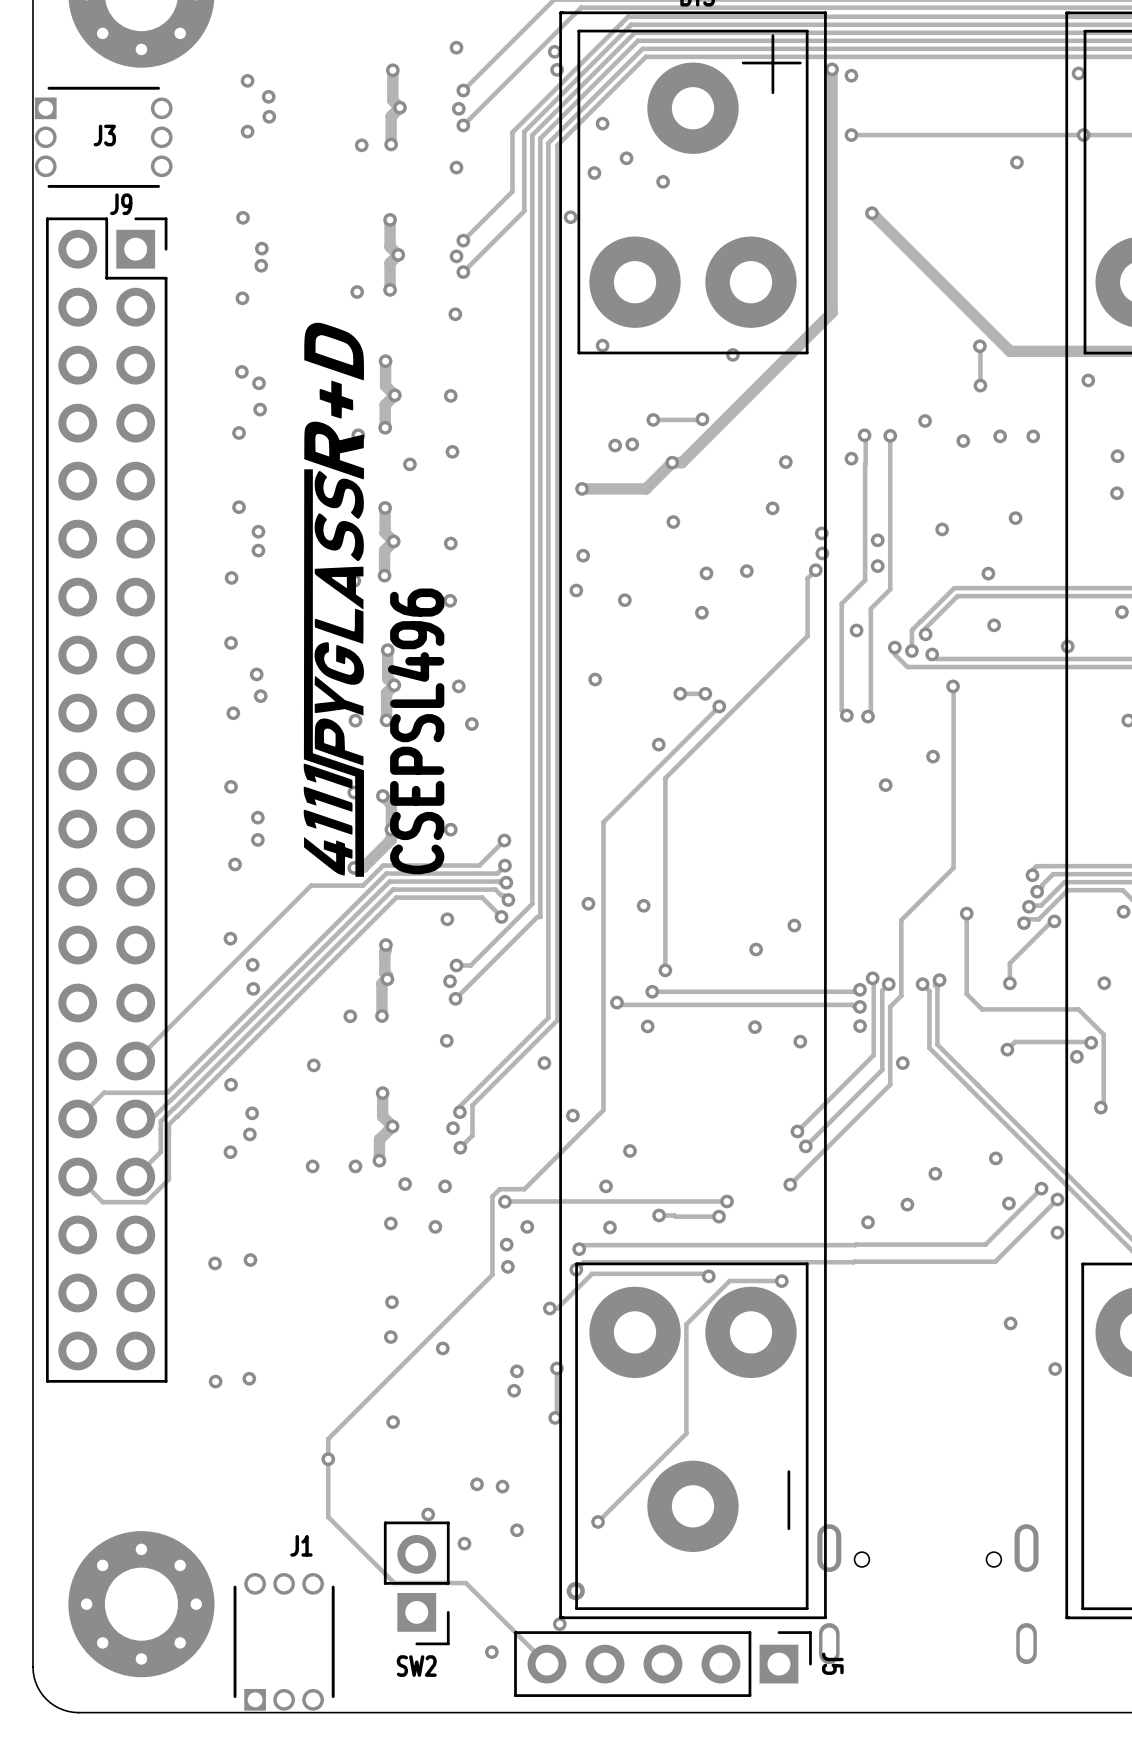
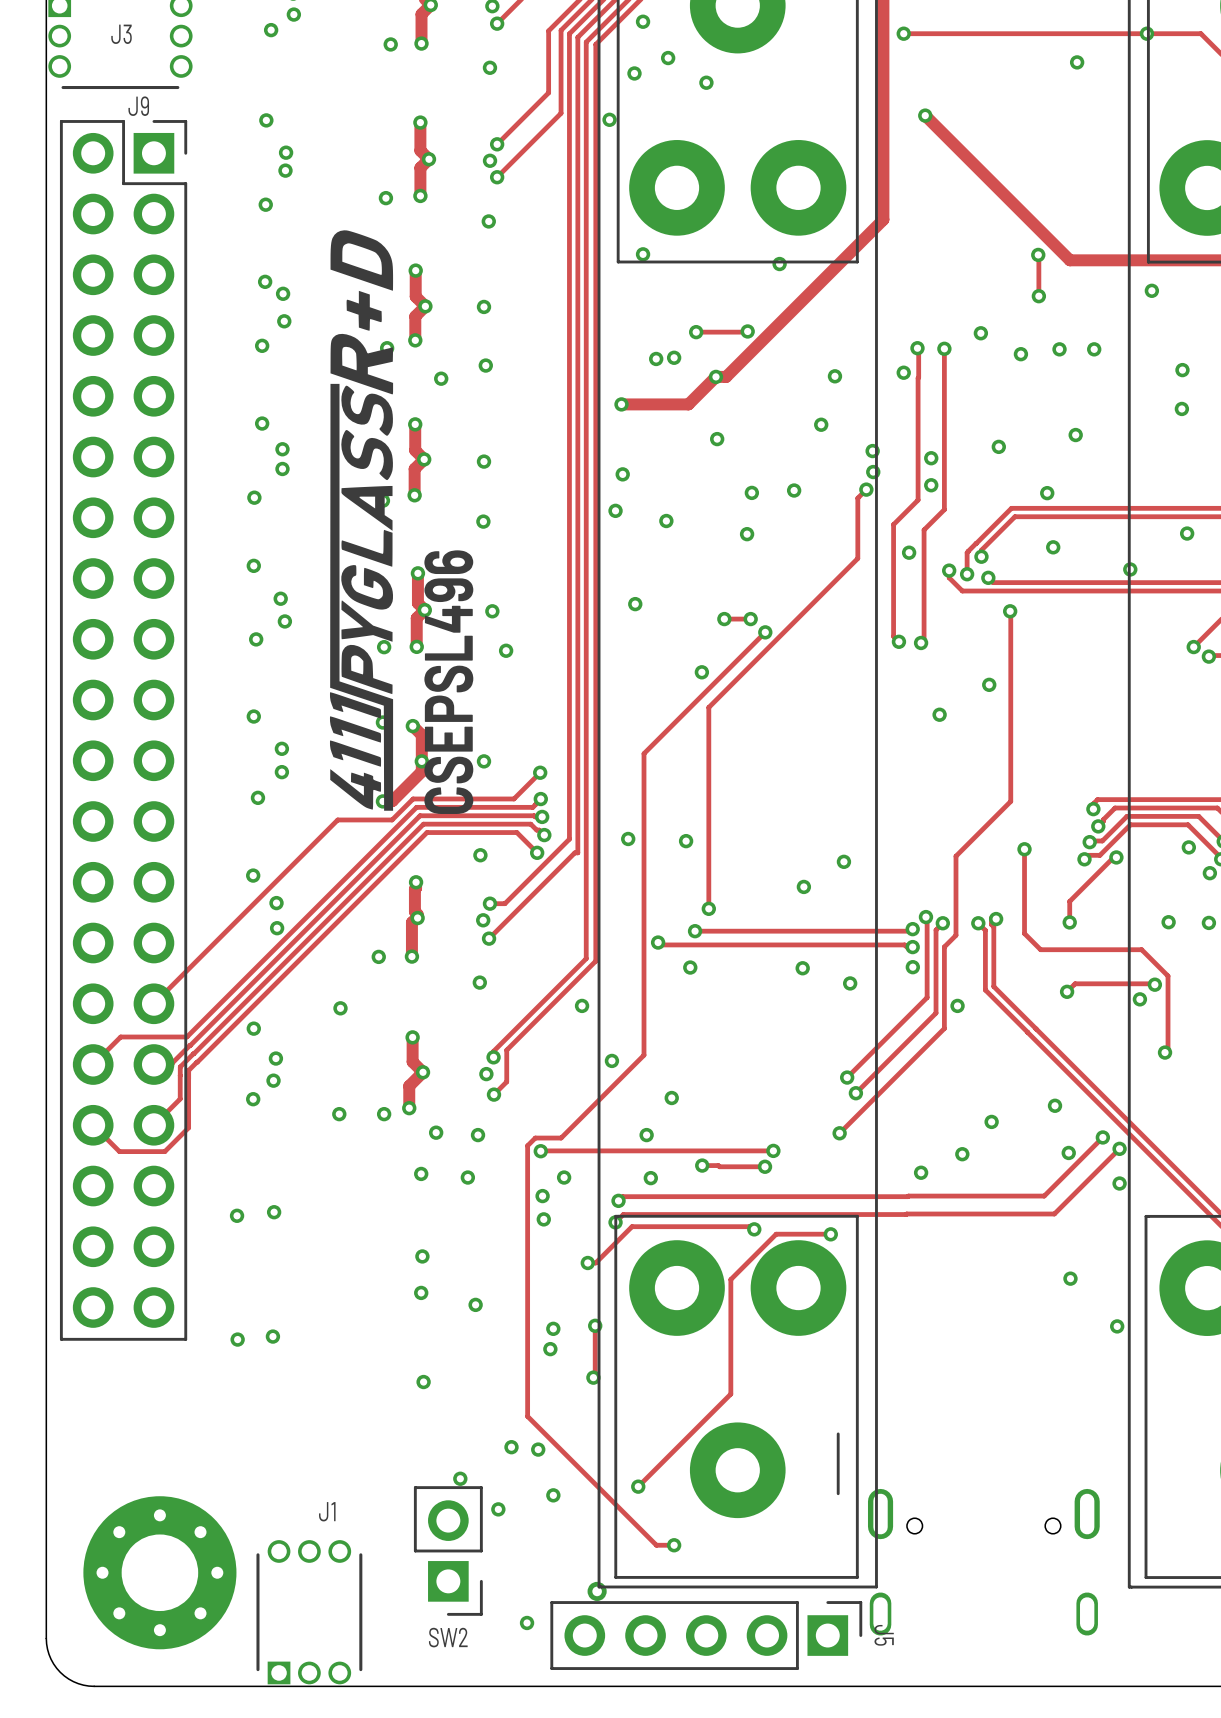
track: (492, 1274) (328, 1439) (328, 1517) (394, 1583) (465, 1583) (547, 1664) -> (527, 1227) (527, 1416) (656, 1545) (674, 1545)
via: (328, 1459) -> none
via position: (575, 1591) -> (597, 1591)
via position: (559, 1624) -> (674, 1545)

